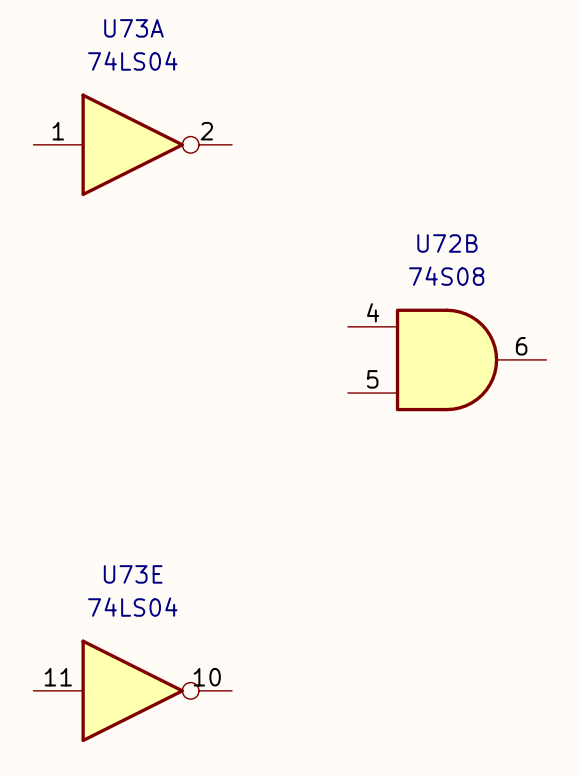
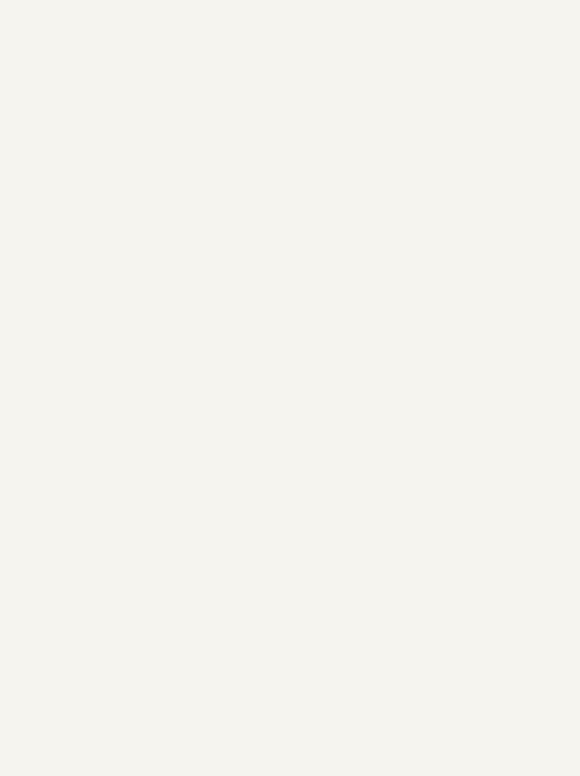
U73A: 74LS04 (132, 144) -> none
U72B: 74S08 (447, 359) -> none
U73E: 74LS04 (132, 690) -> none

